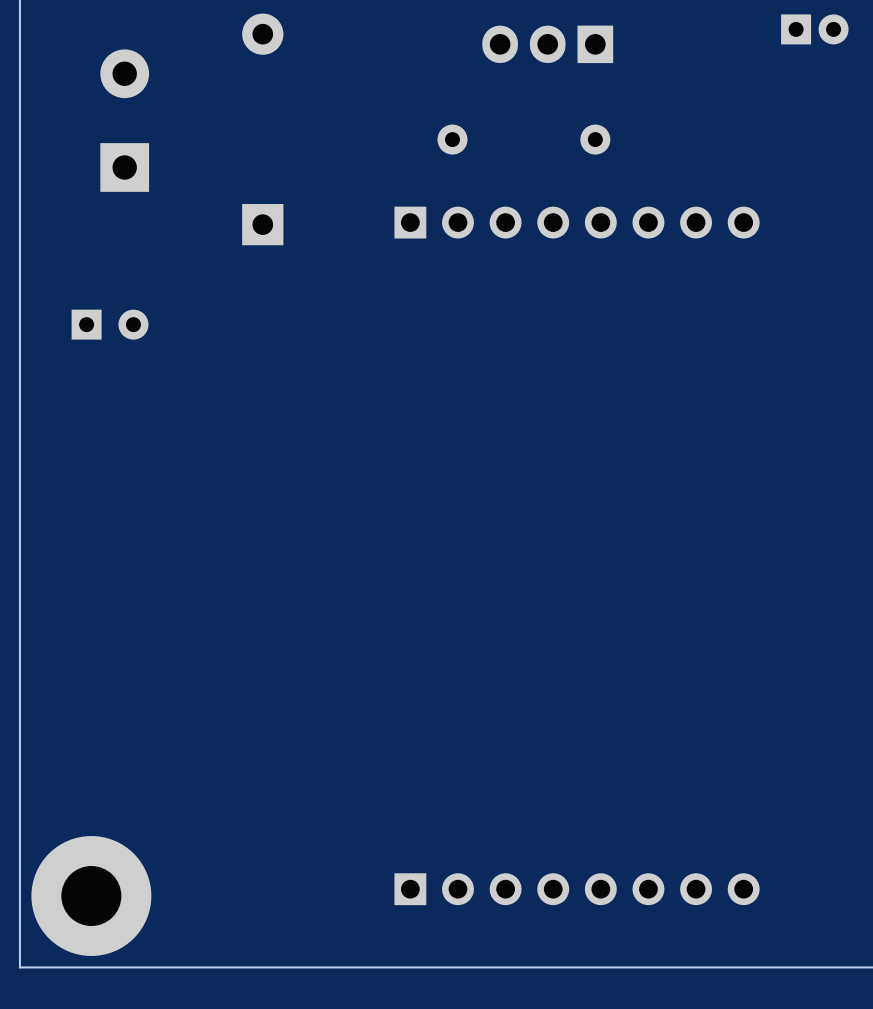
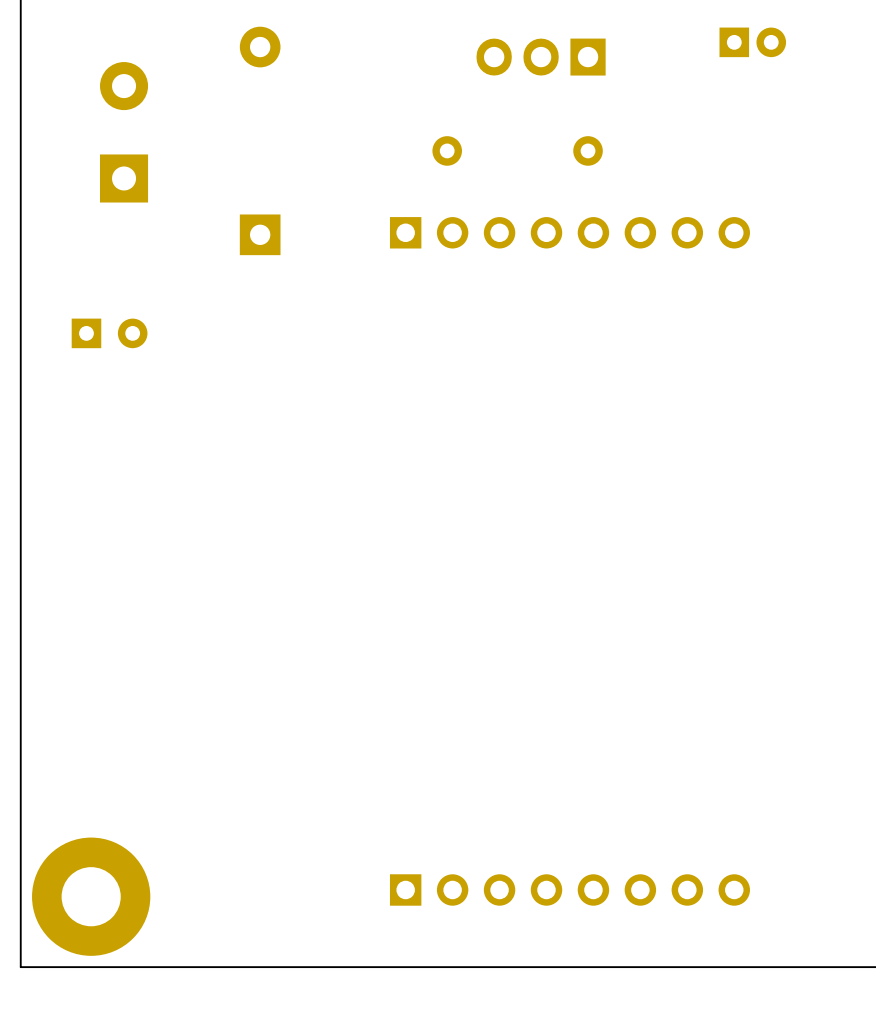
part position: (814, 29) -> (752, 42)

